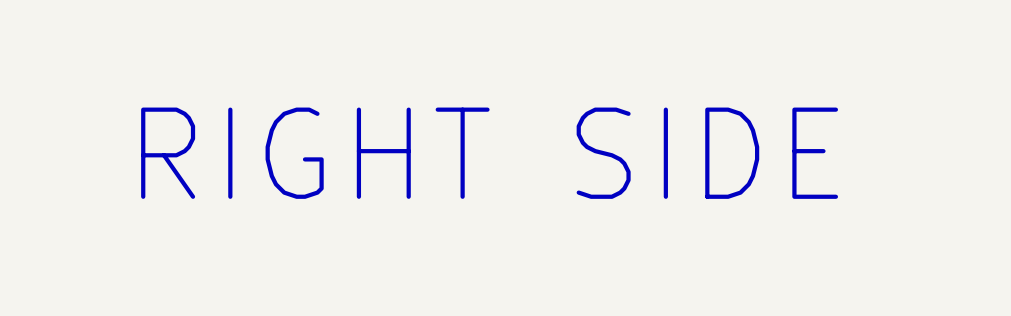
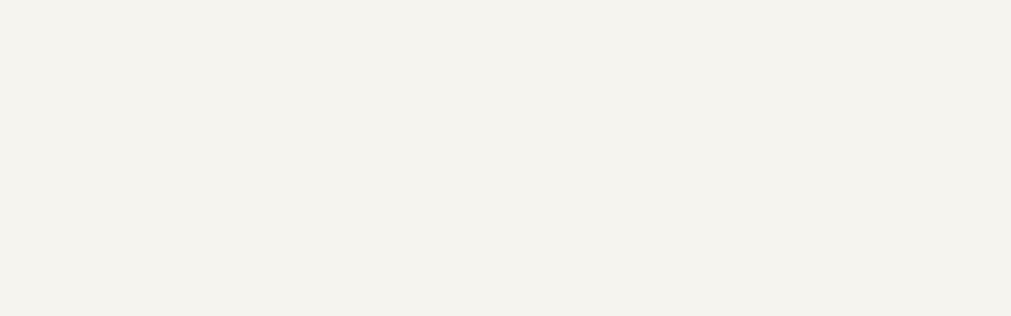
text: RIGHT SIDE (489, 153) -> none

